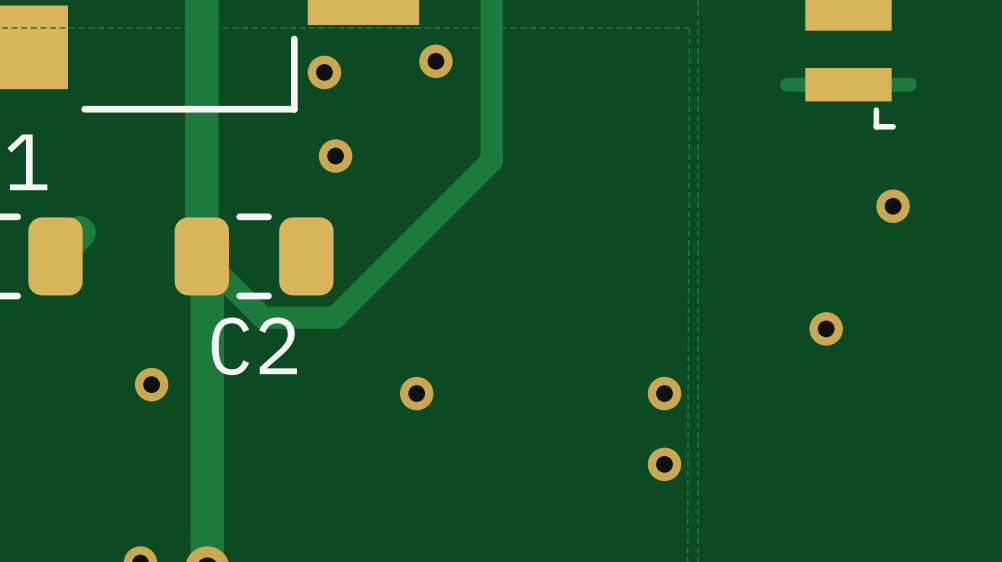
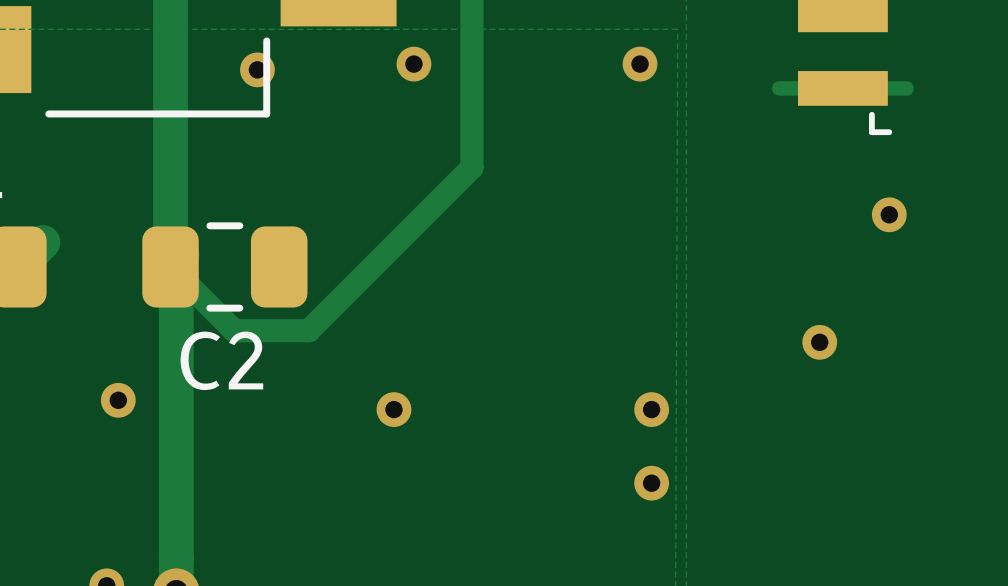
via: none -> (640, 64)
via position: (324, 72) -> (257, 69)
via: (335, 156) -> none

